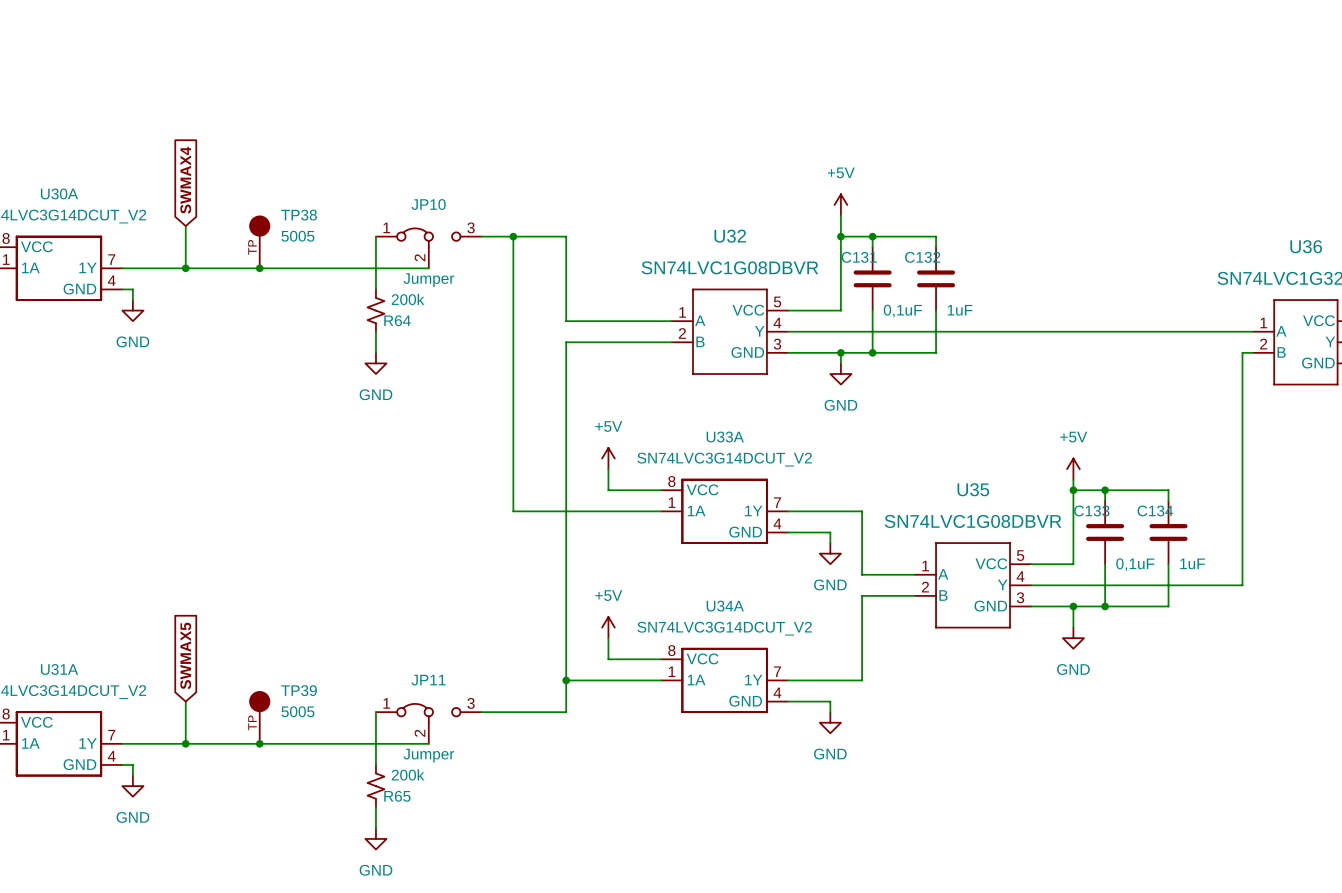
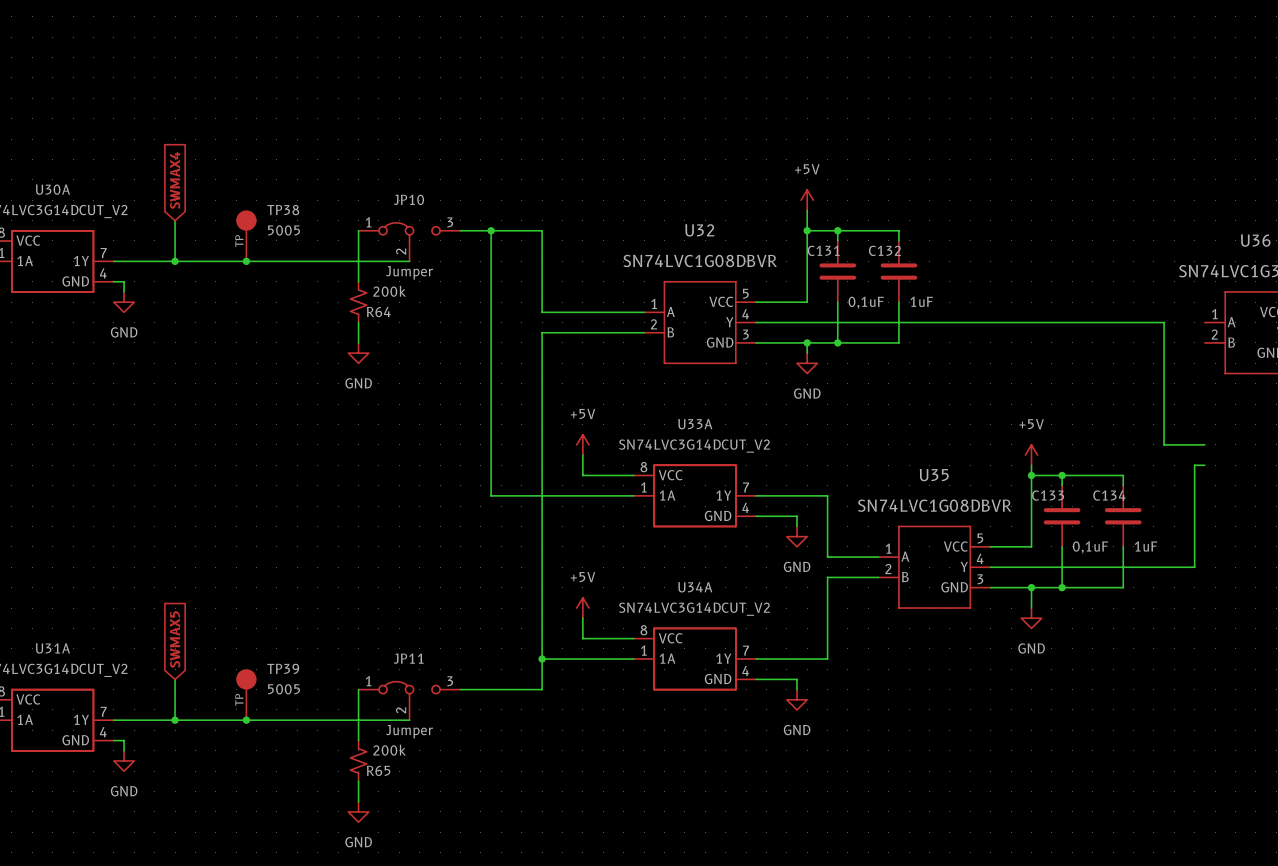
wire: (1210, 331) (1253, 331) -> (1164, 322) (1164, 444) (1204, 444)
wire: (1253, 352) (1242, 352) (1242, 479) -> (1204, 465) (1194, 465)

